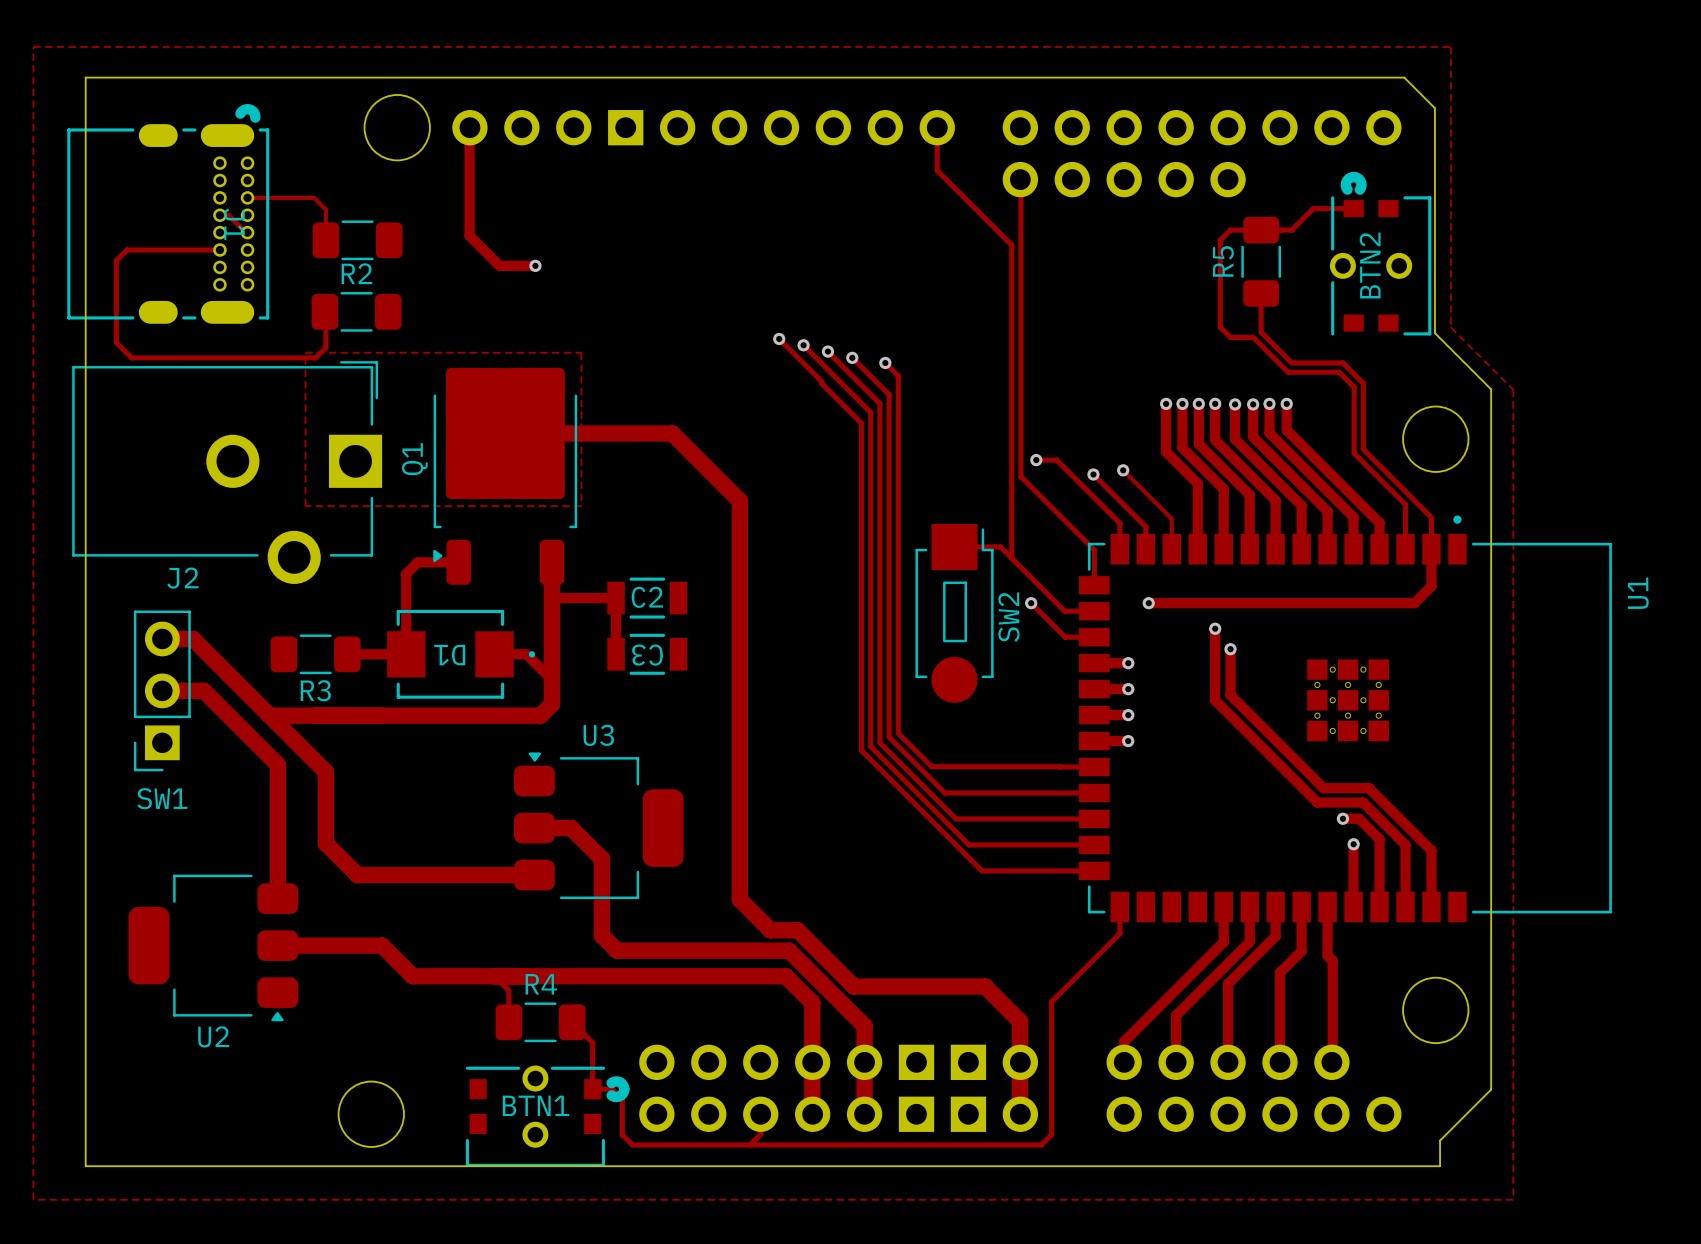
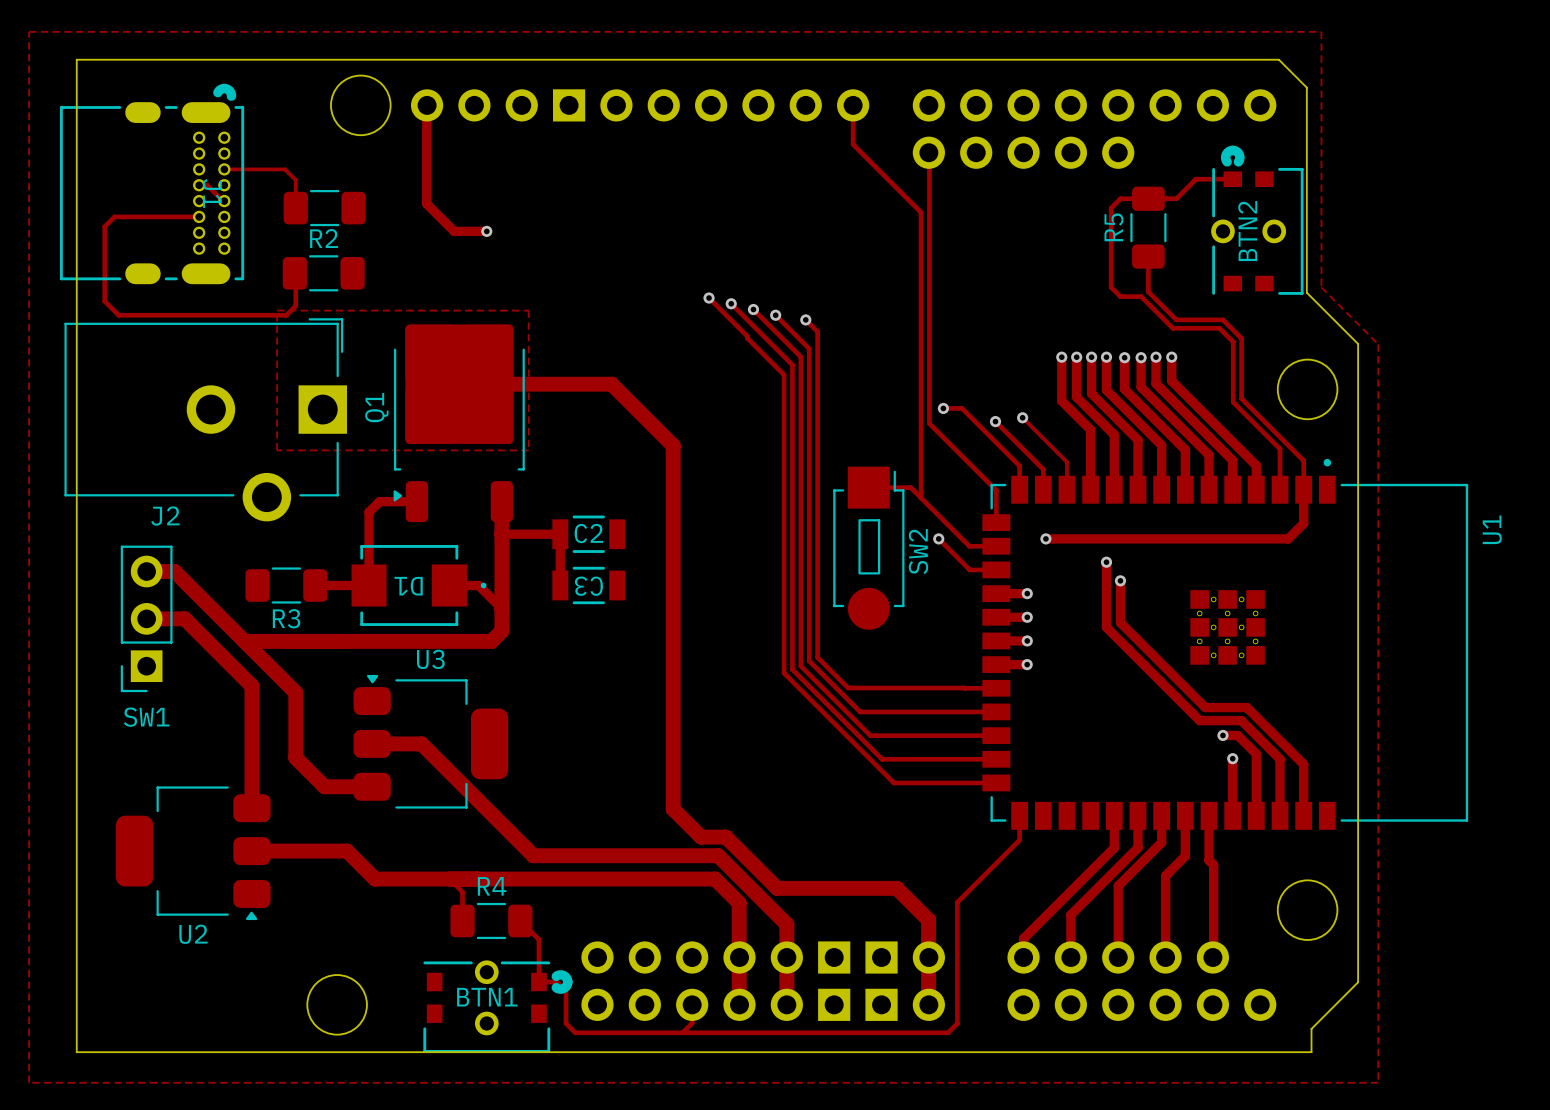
U3 position: (598, 825) -> (430, 741)
track: (534, 828) (571, 828) (601, 858) (601, 935) (617, 950) -> (372, 743) (421, 743) (533, 855) (561, 855)
track: (409, 875) (534, 875) -> none

